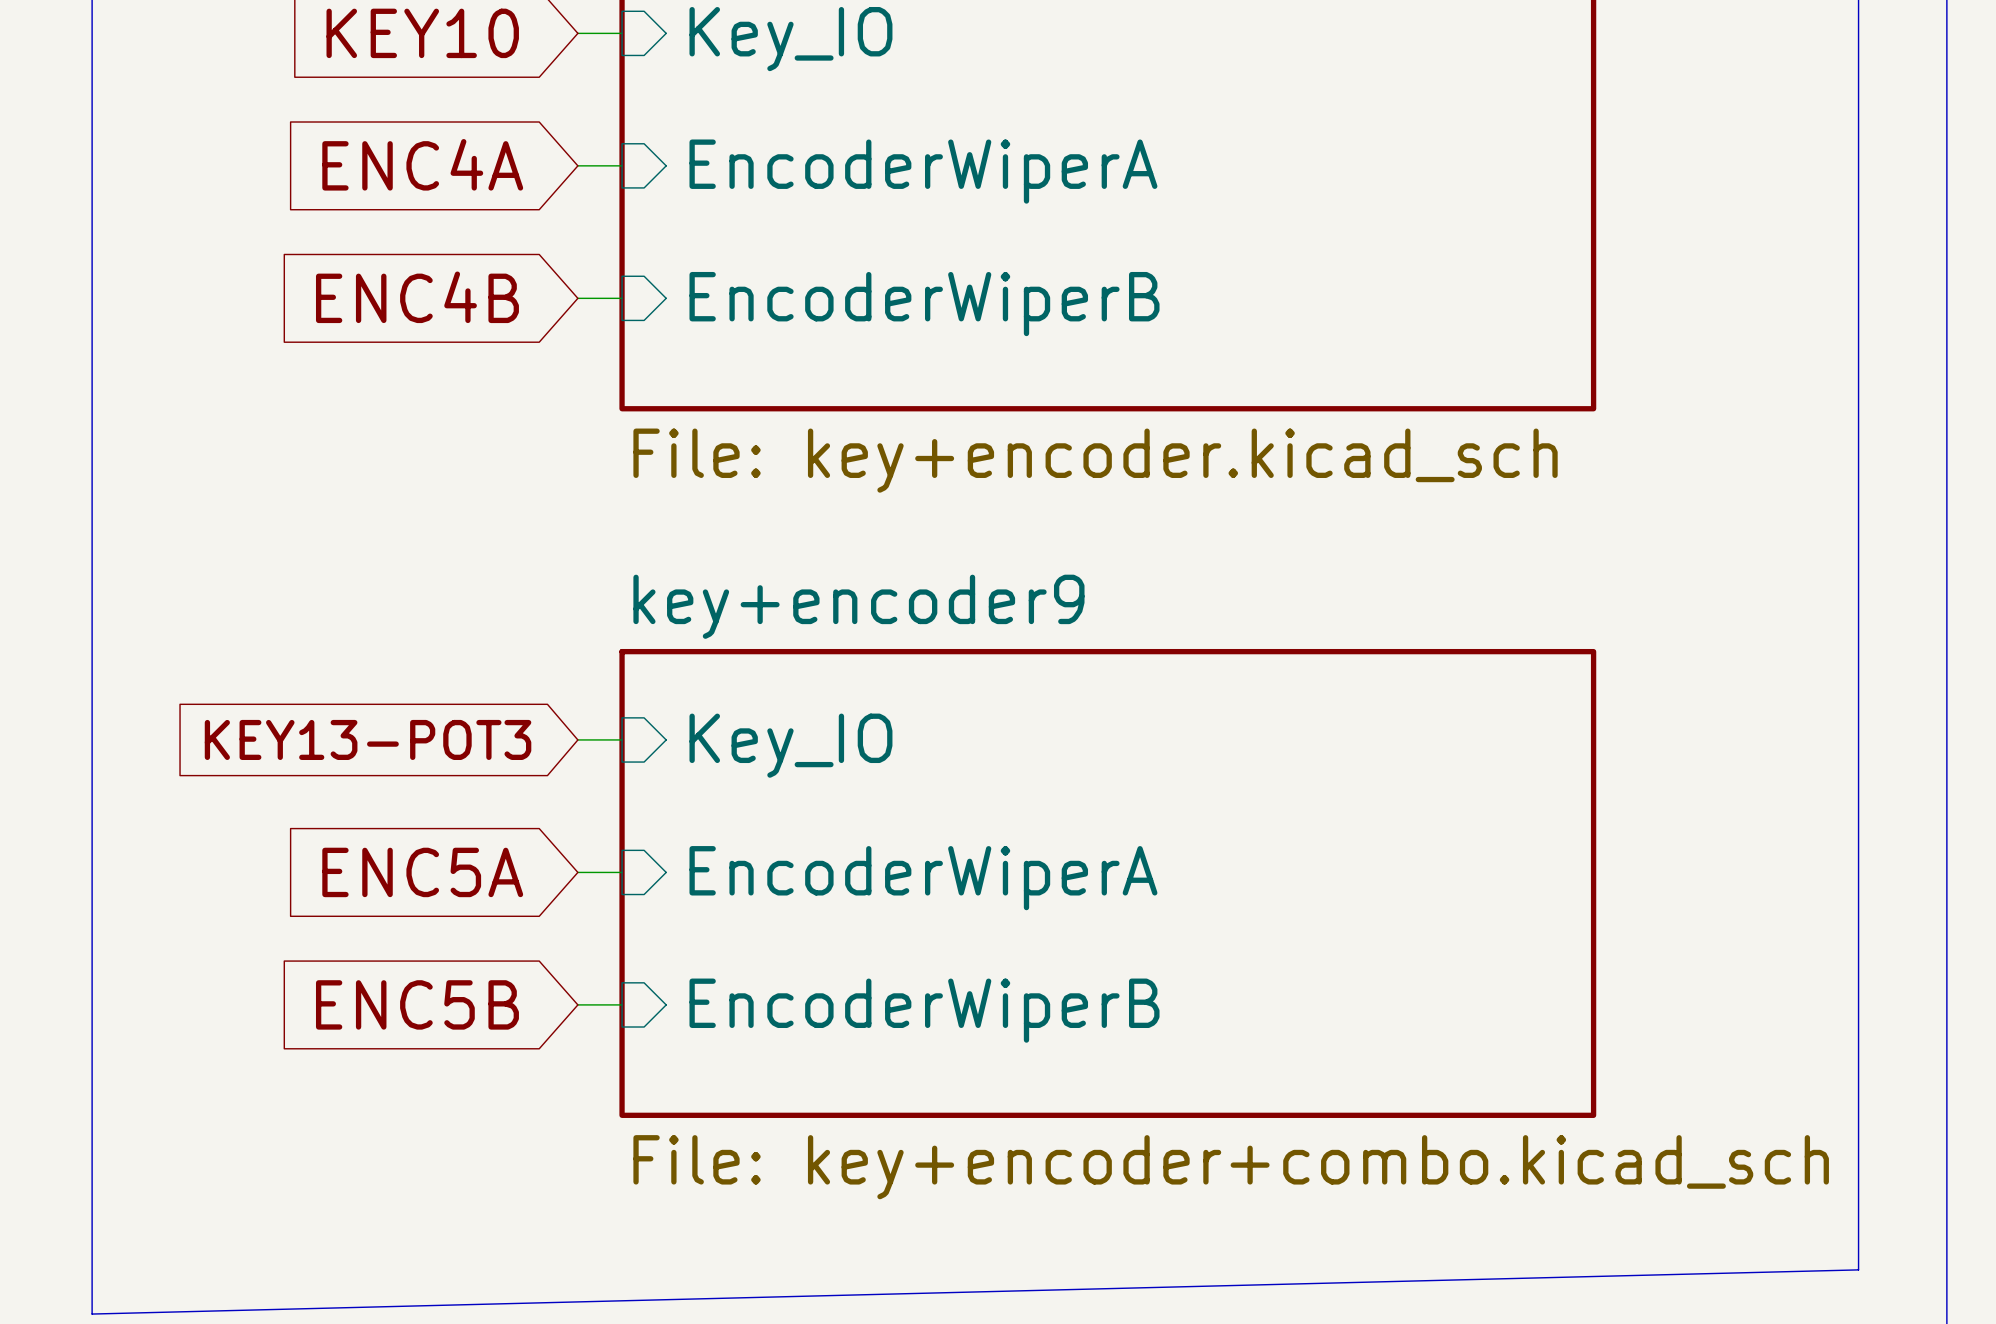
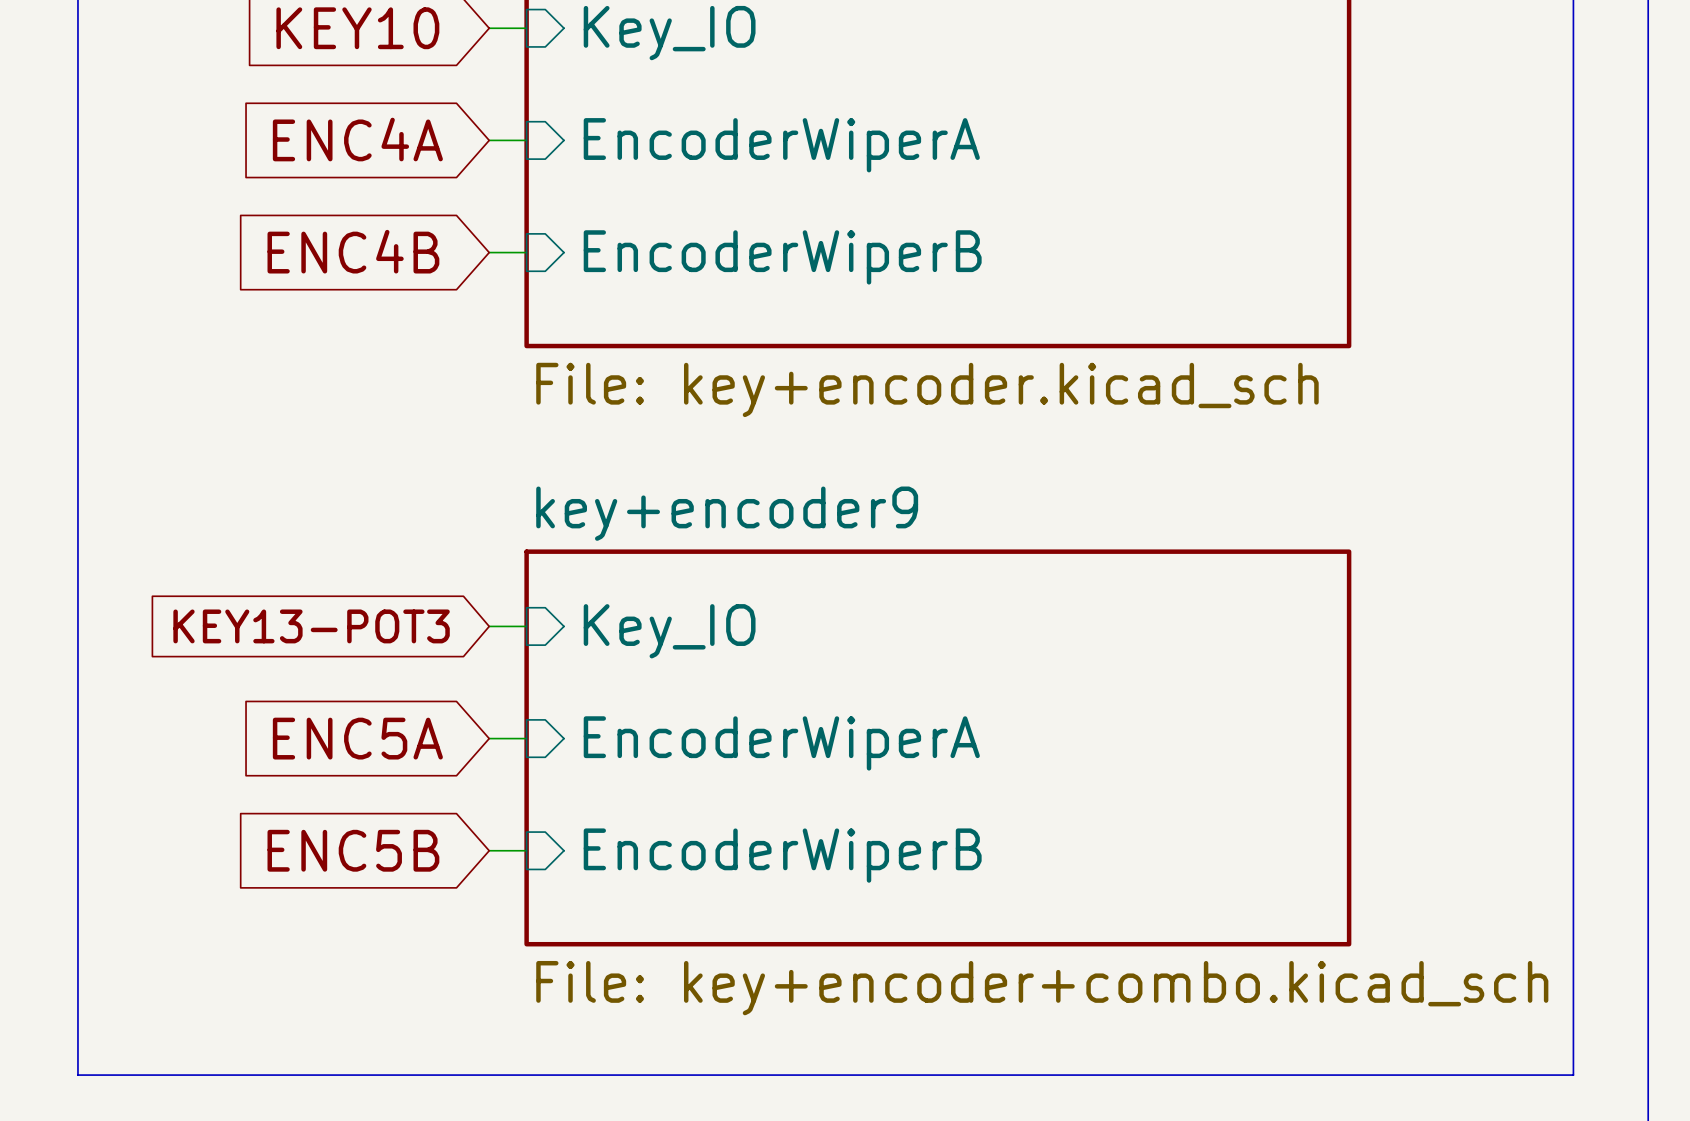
line: (92, 1269) (92, 1314) (1858, 1269) -> (77, 1075) (1573, 1075)

